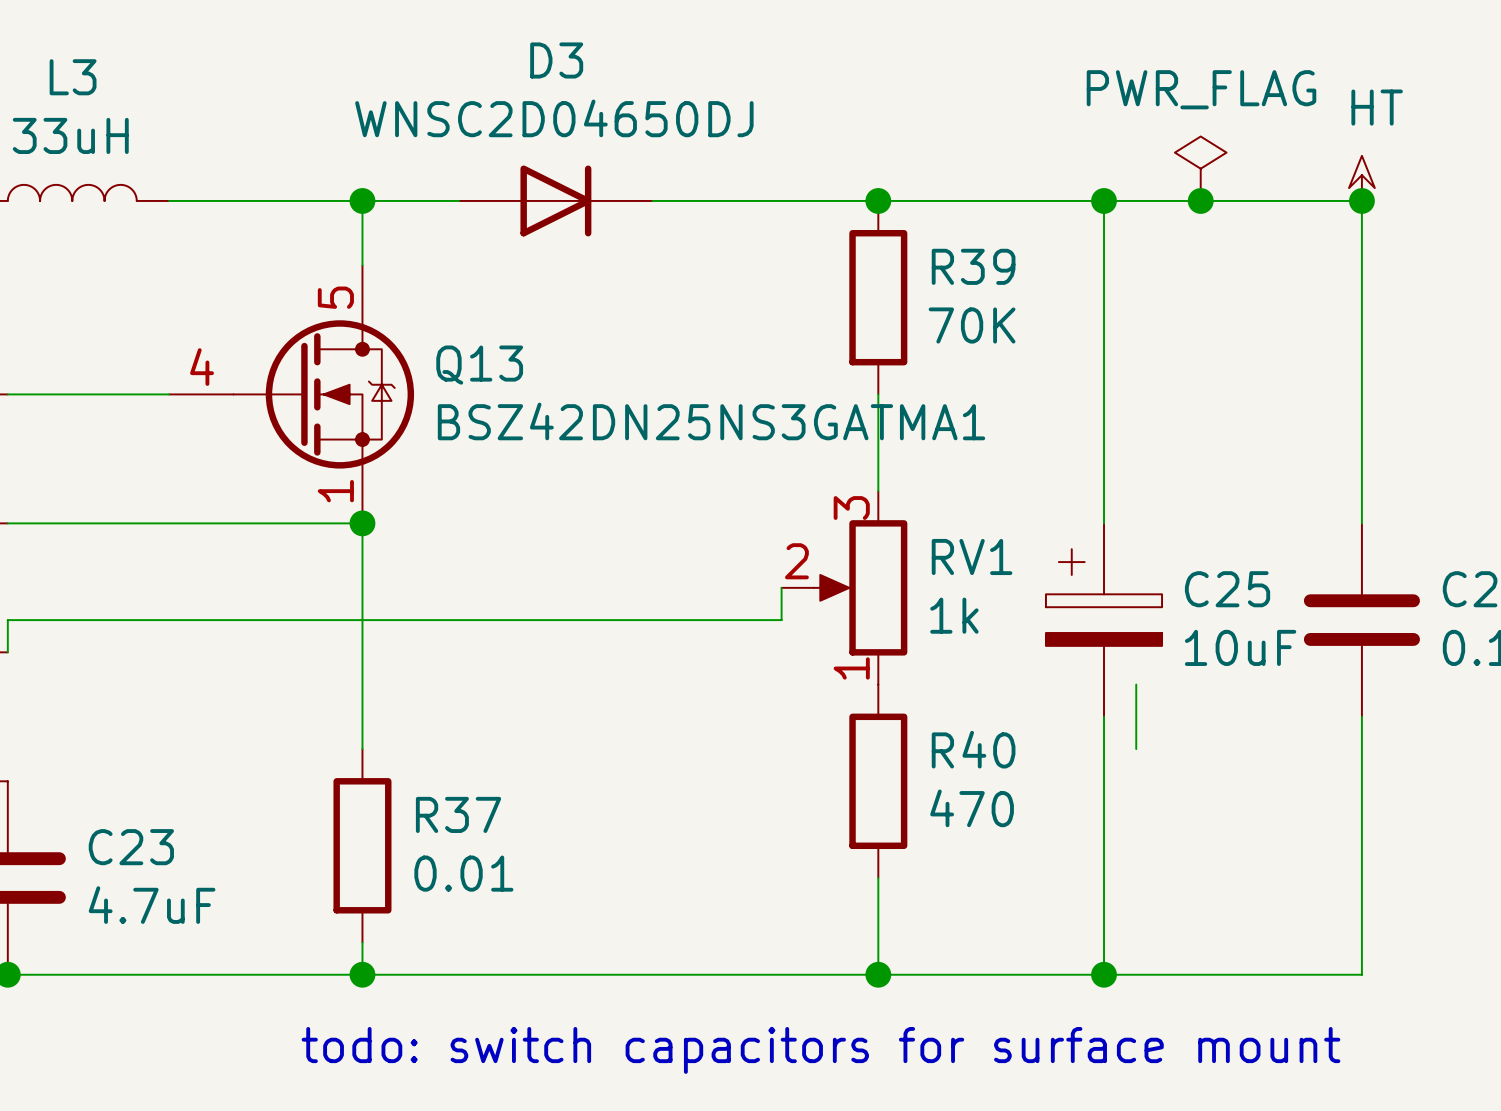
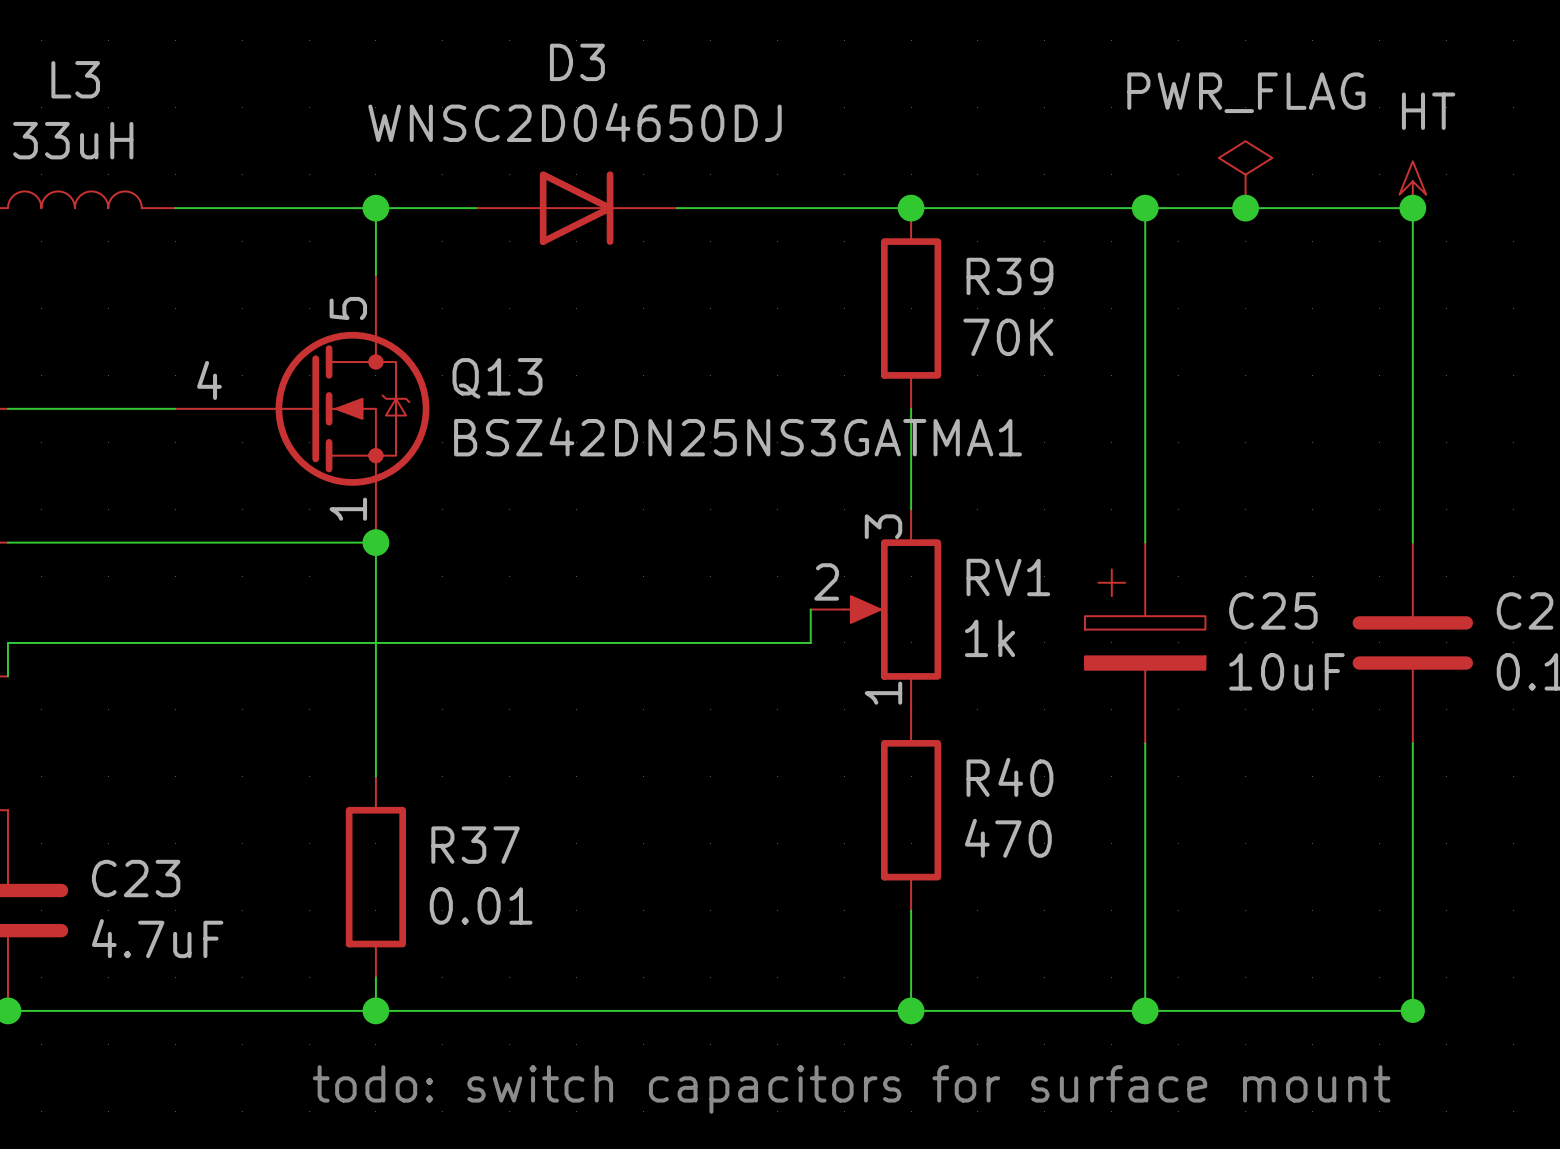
wire: (1136, 684) (1136, 749) -> none
junction: none -> (1412, 1010)

